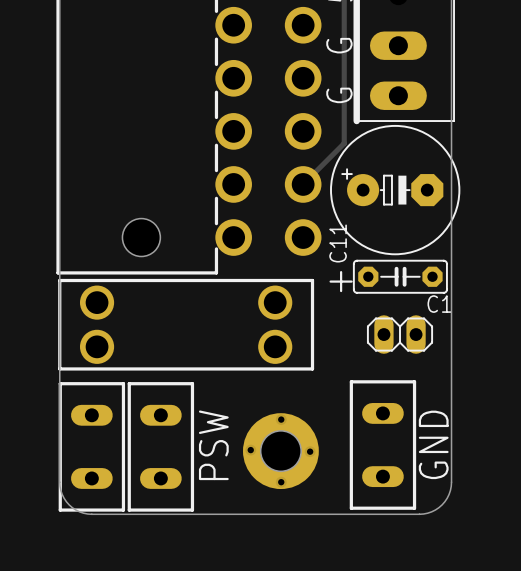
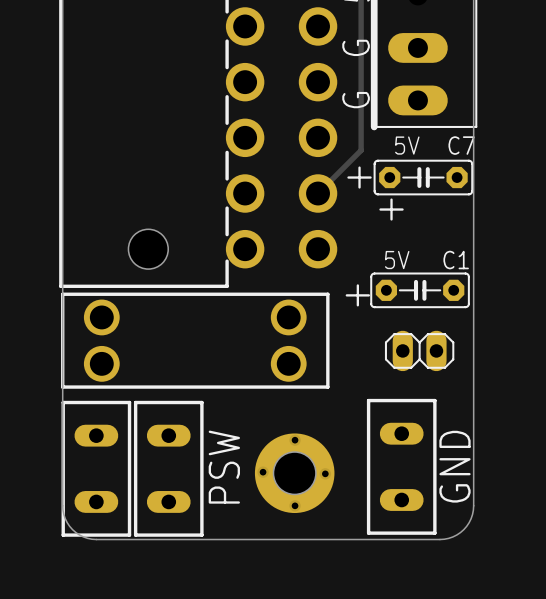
text: none -> 5V (407, 145)
text: none -> + (359, 177)
C7: none -> (423, 177)
C11: (395, 190) -> none
text: none -> + (391, 209)
text: none -> 5V (397, 260)
C1 name position: C1 (439, 304) -> C1 (456, 260)

